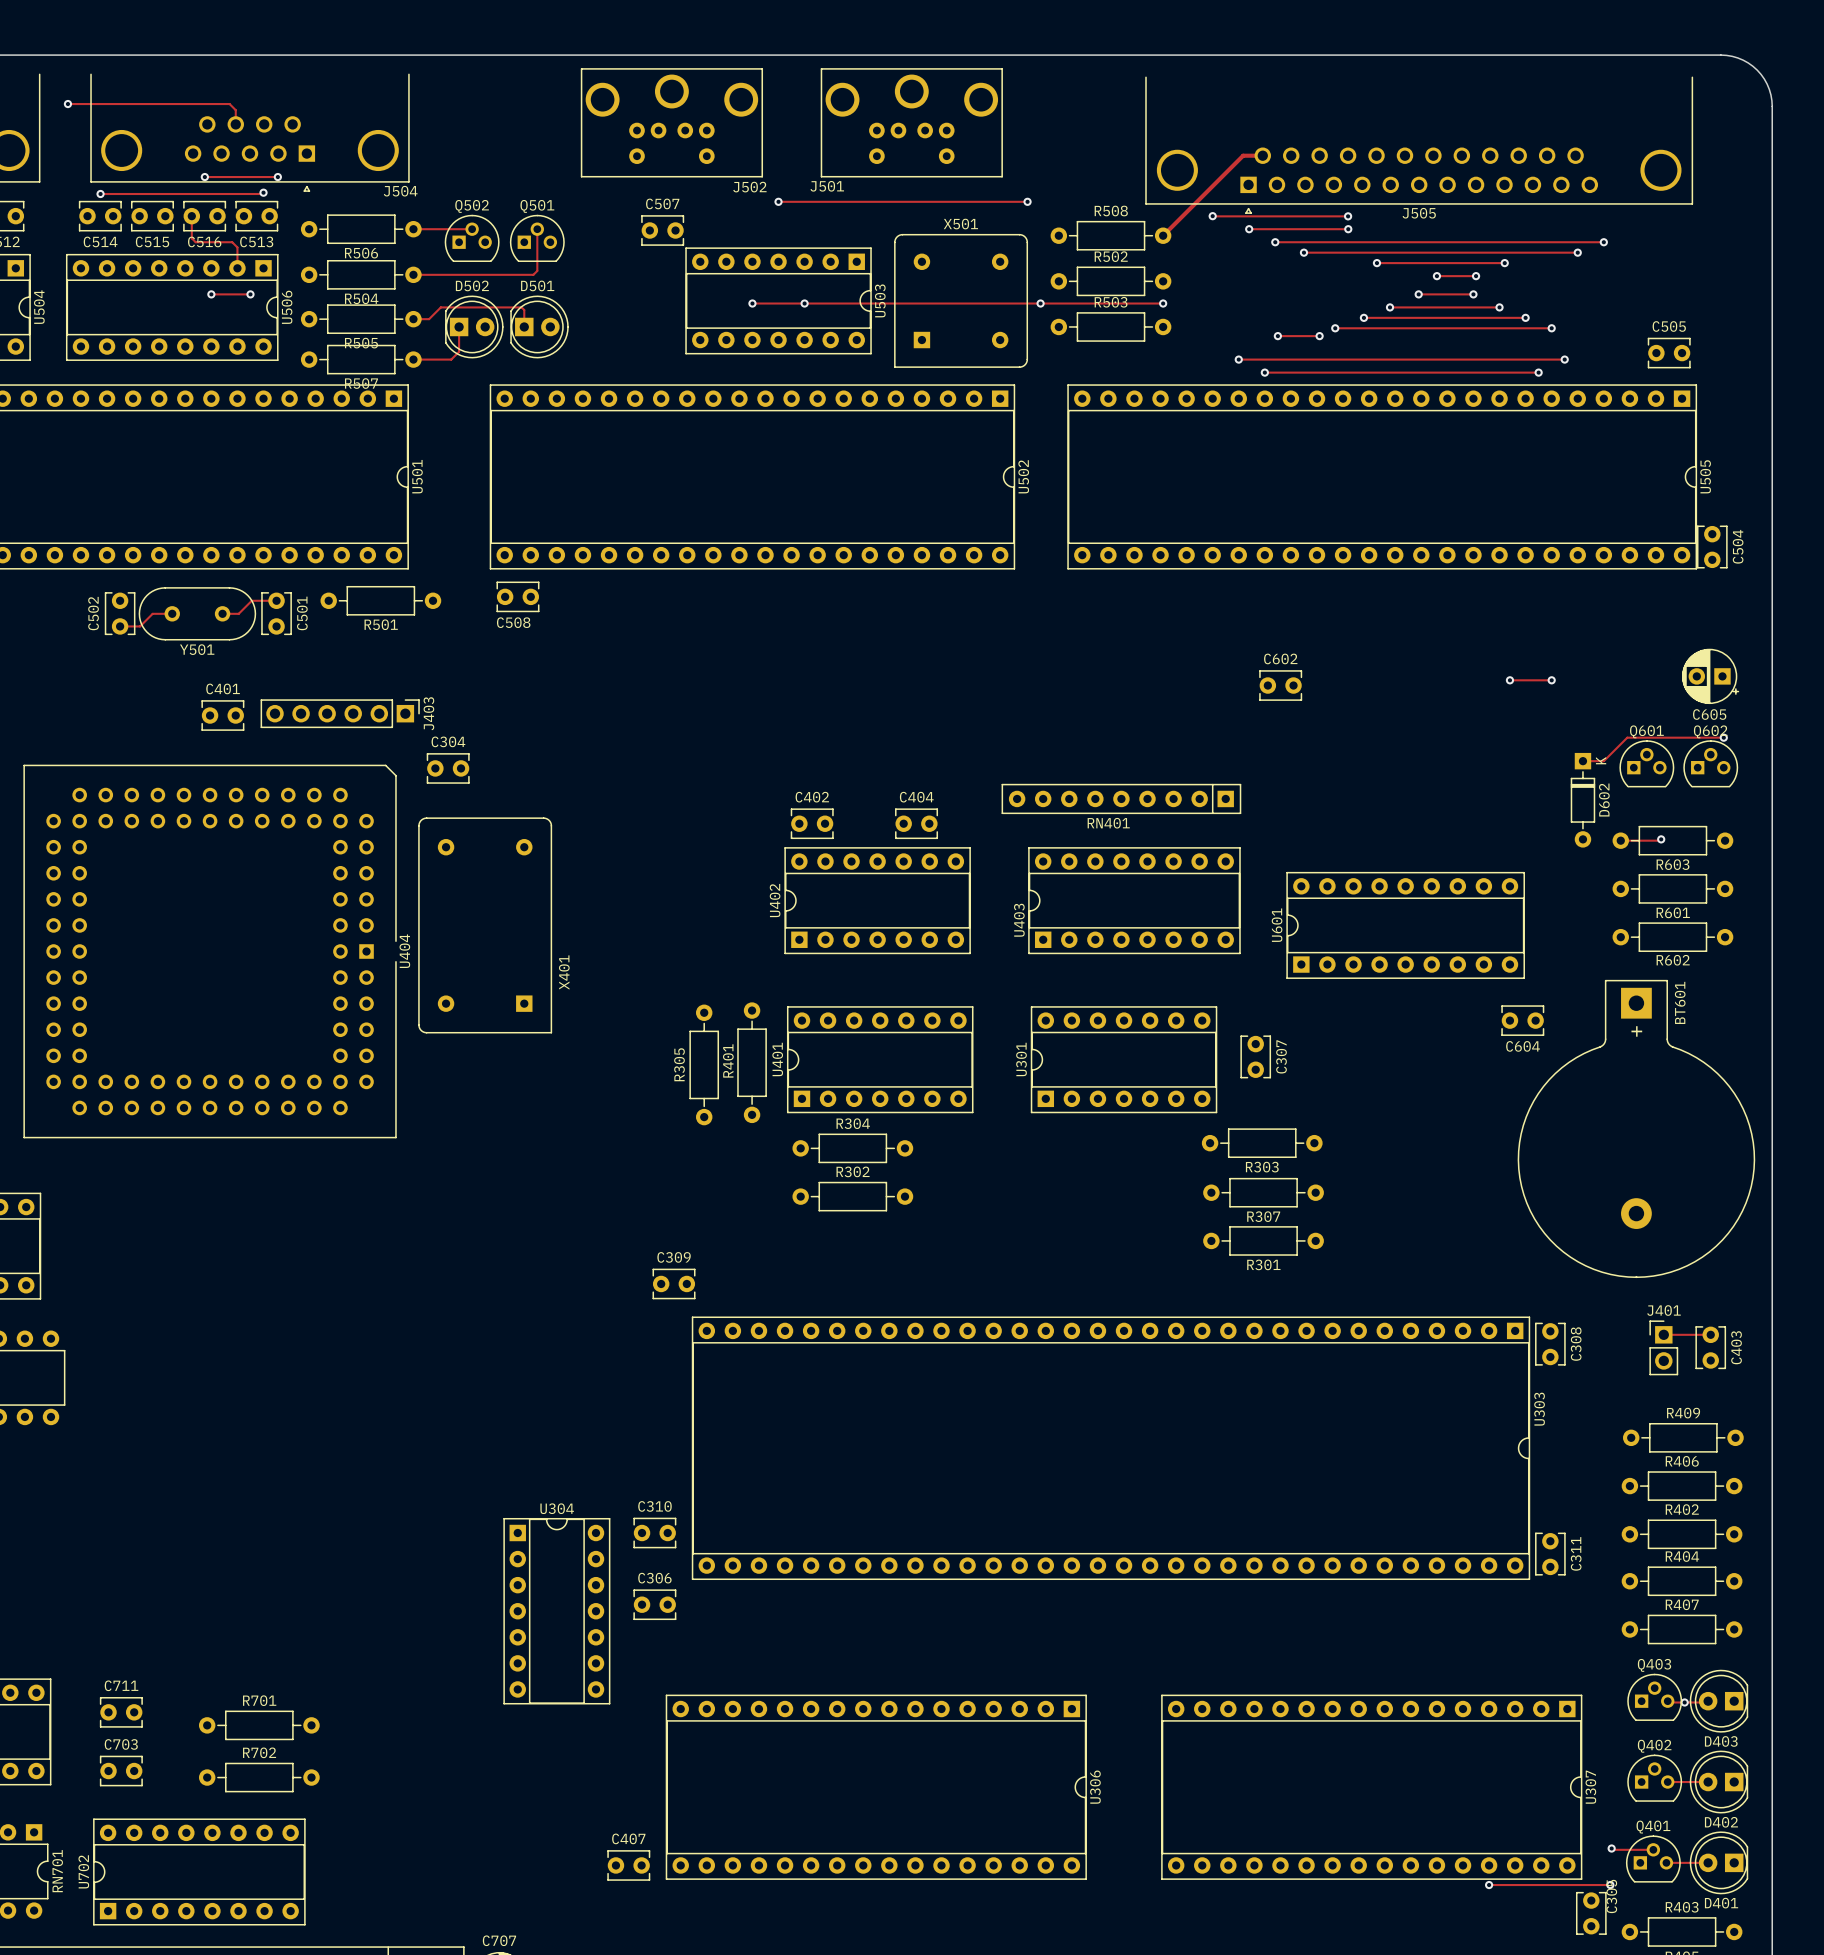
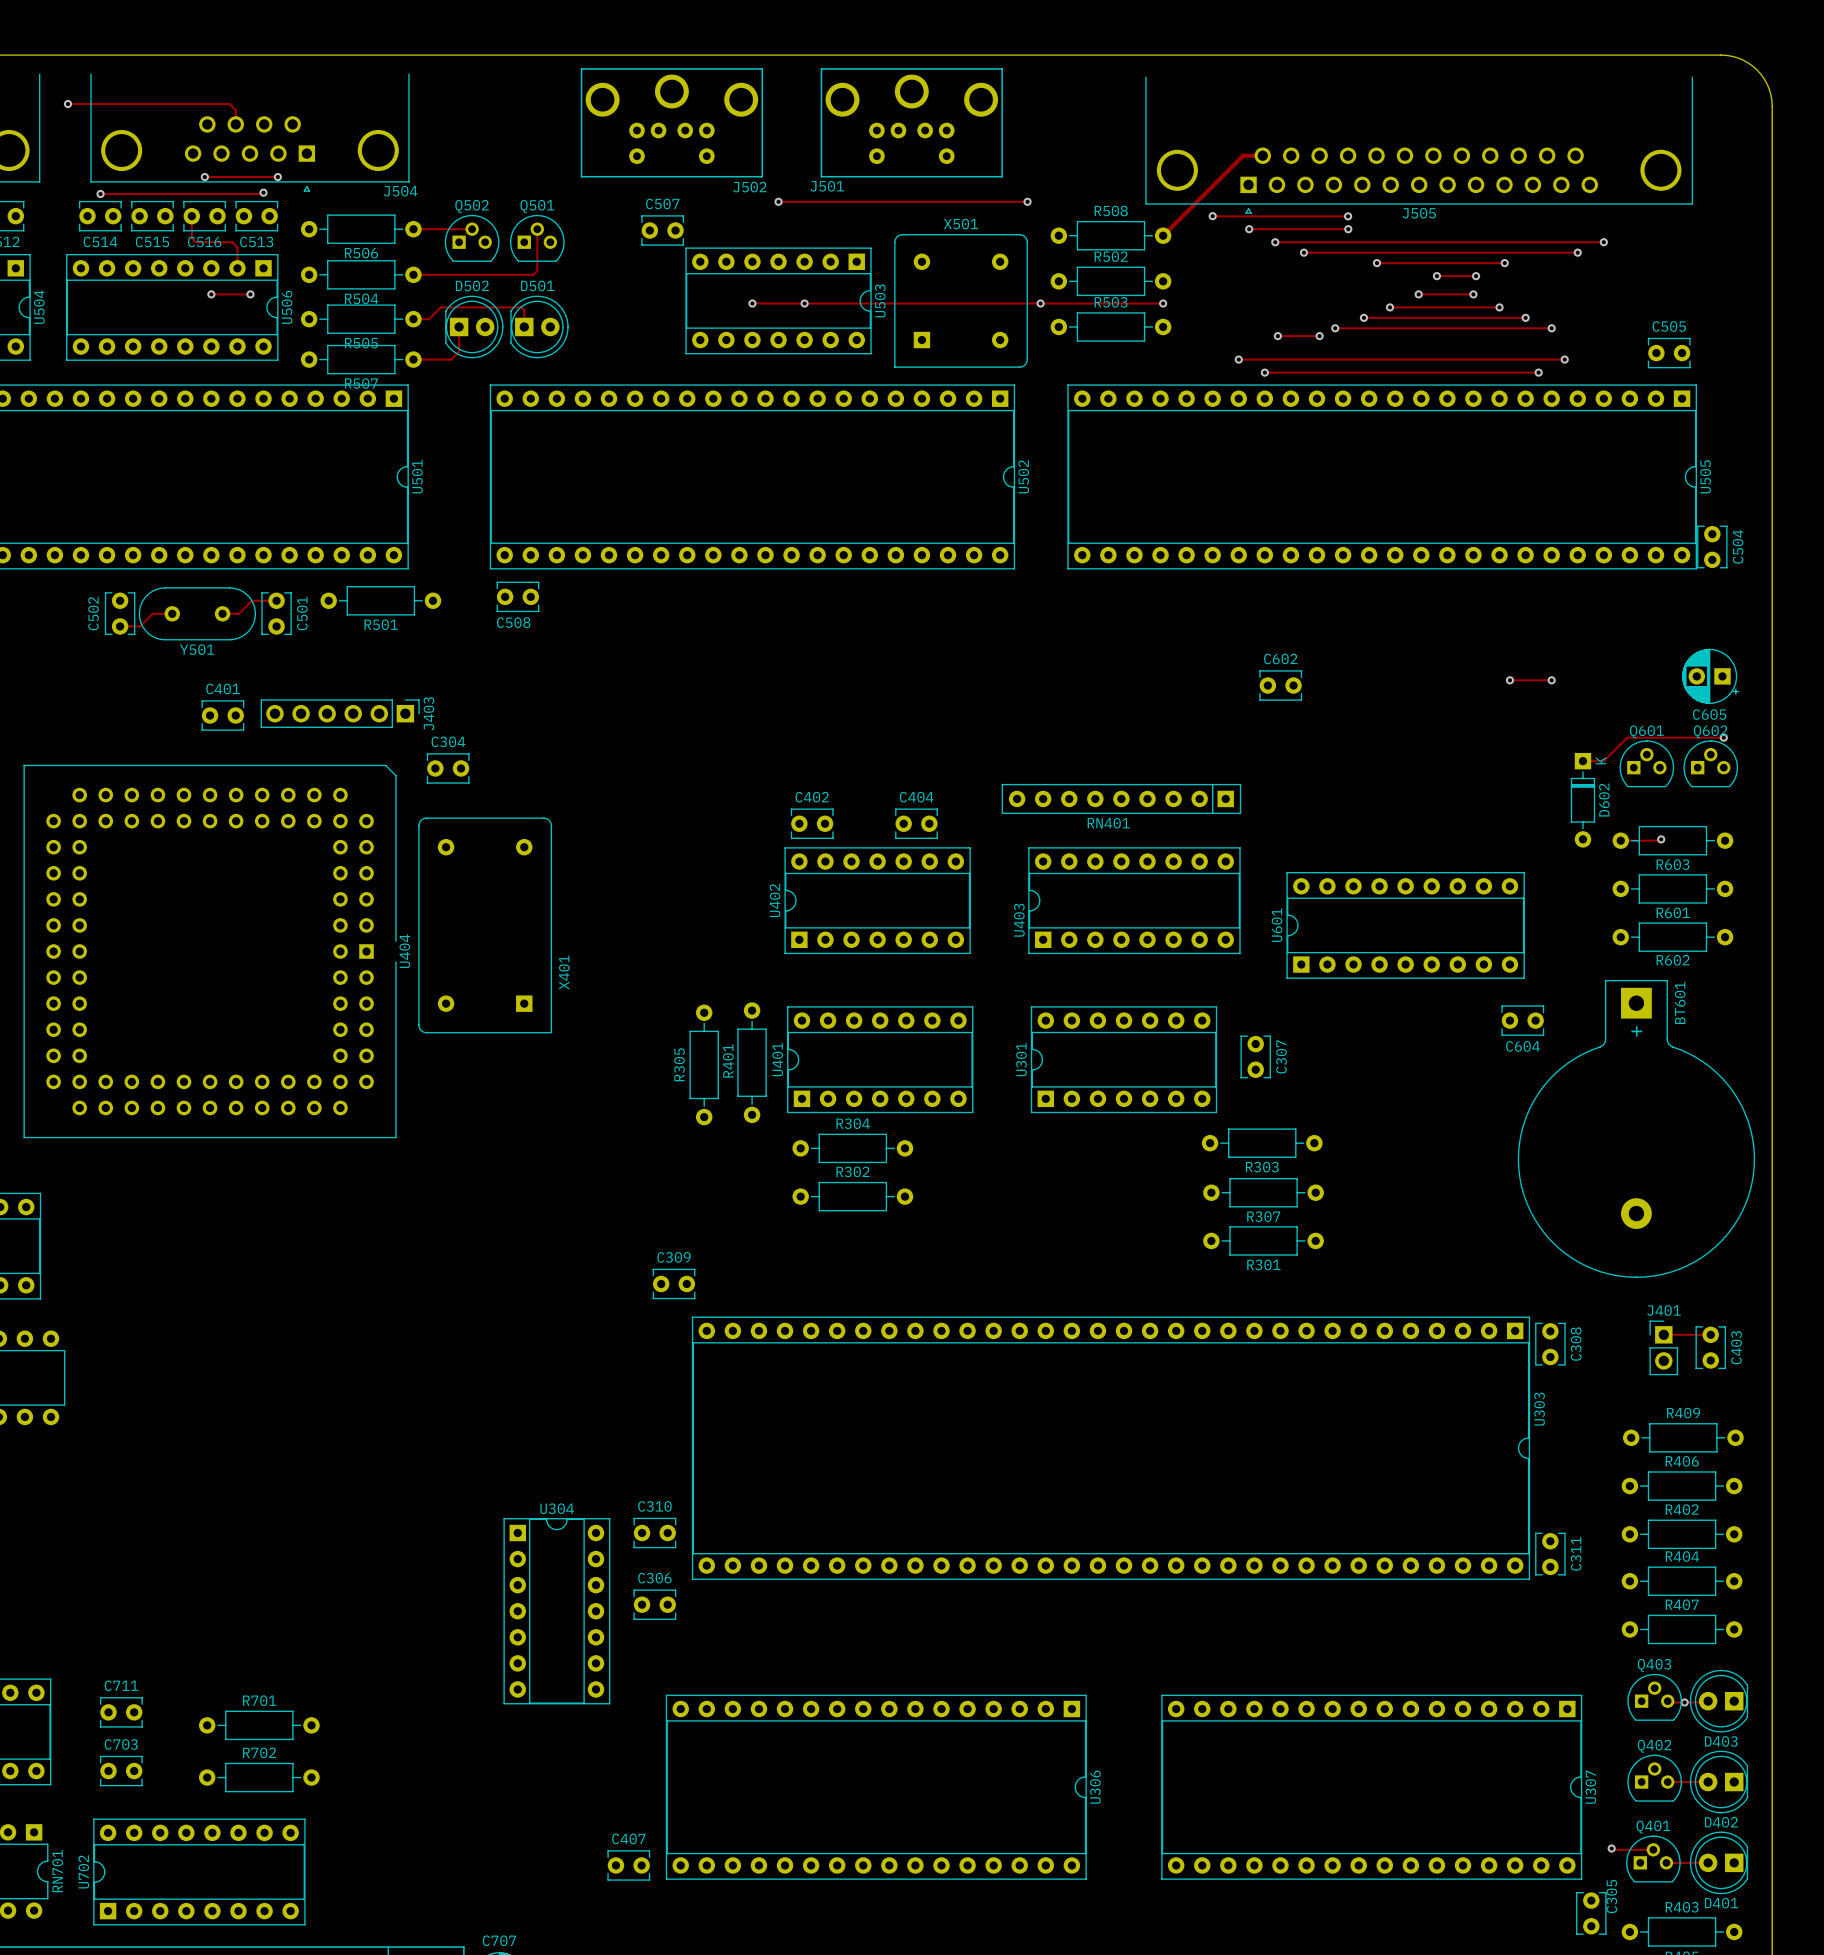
track: (1489, 1885) (1610, 1885) -> none
via: (1489, 1885) -> none
via: (1610, 1885) -> none

